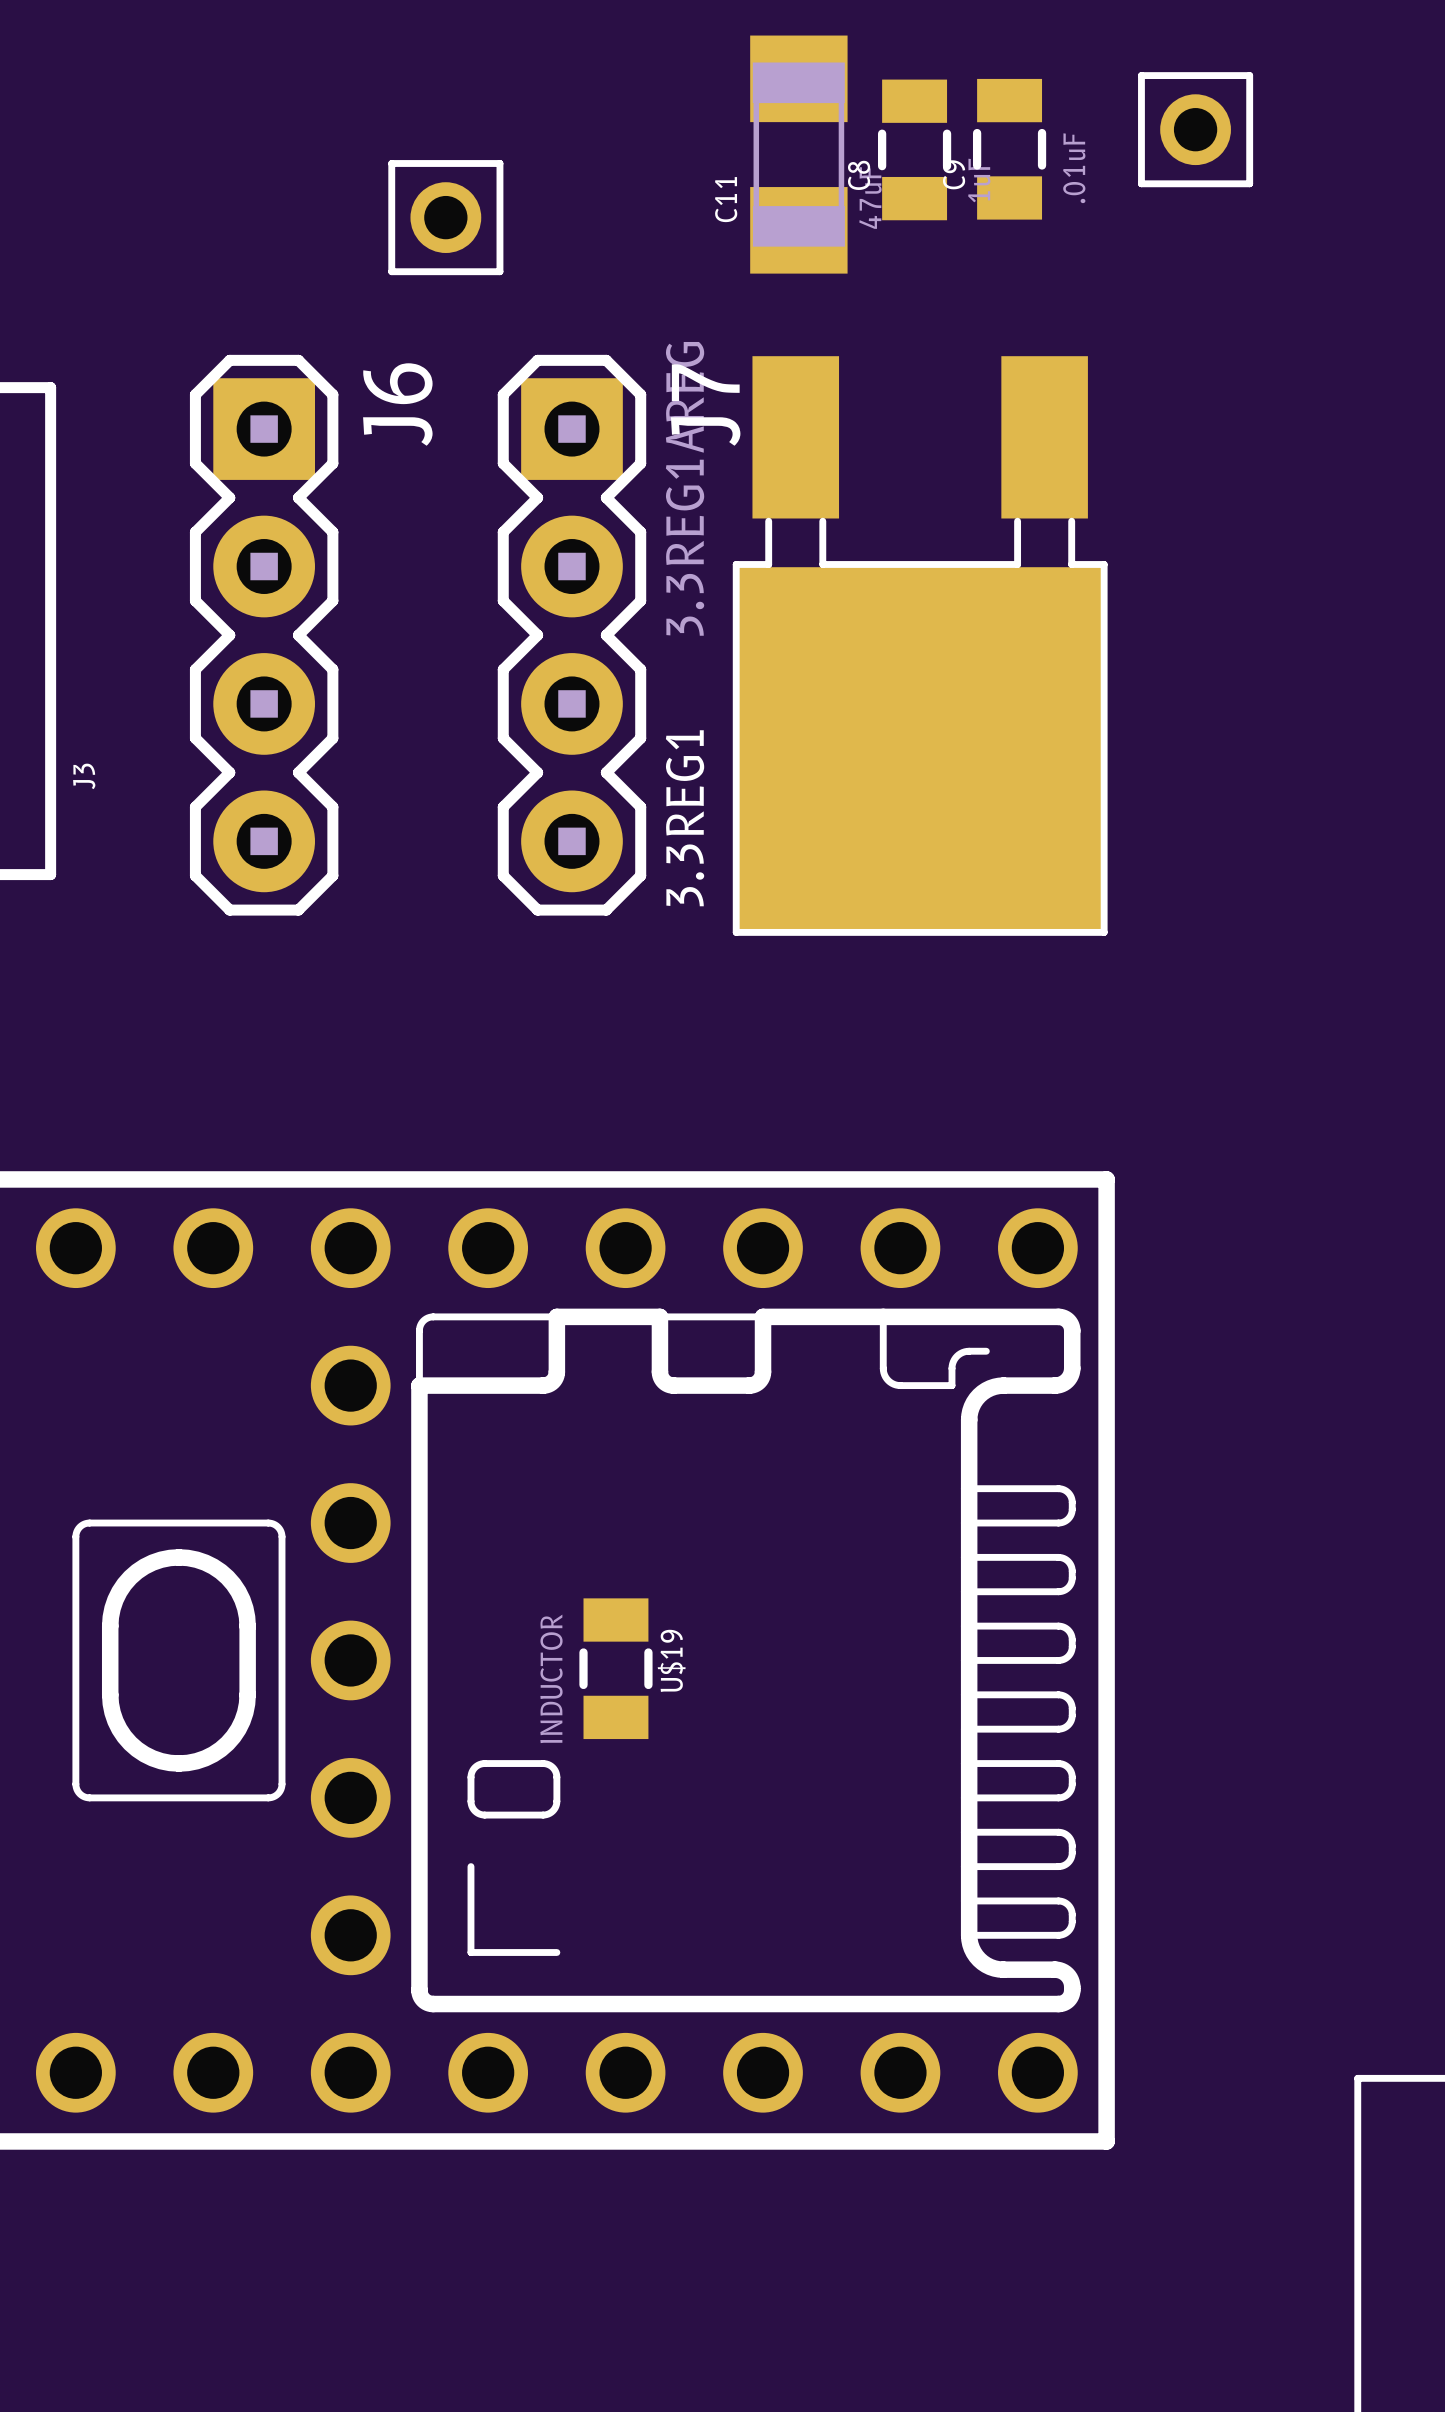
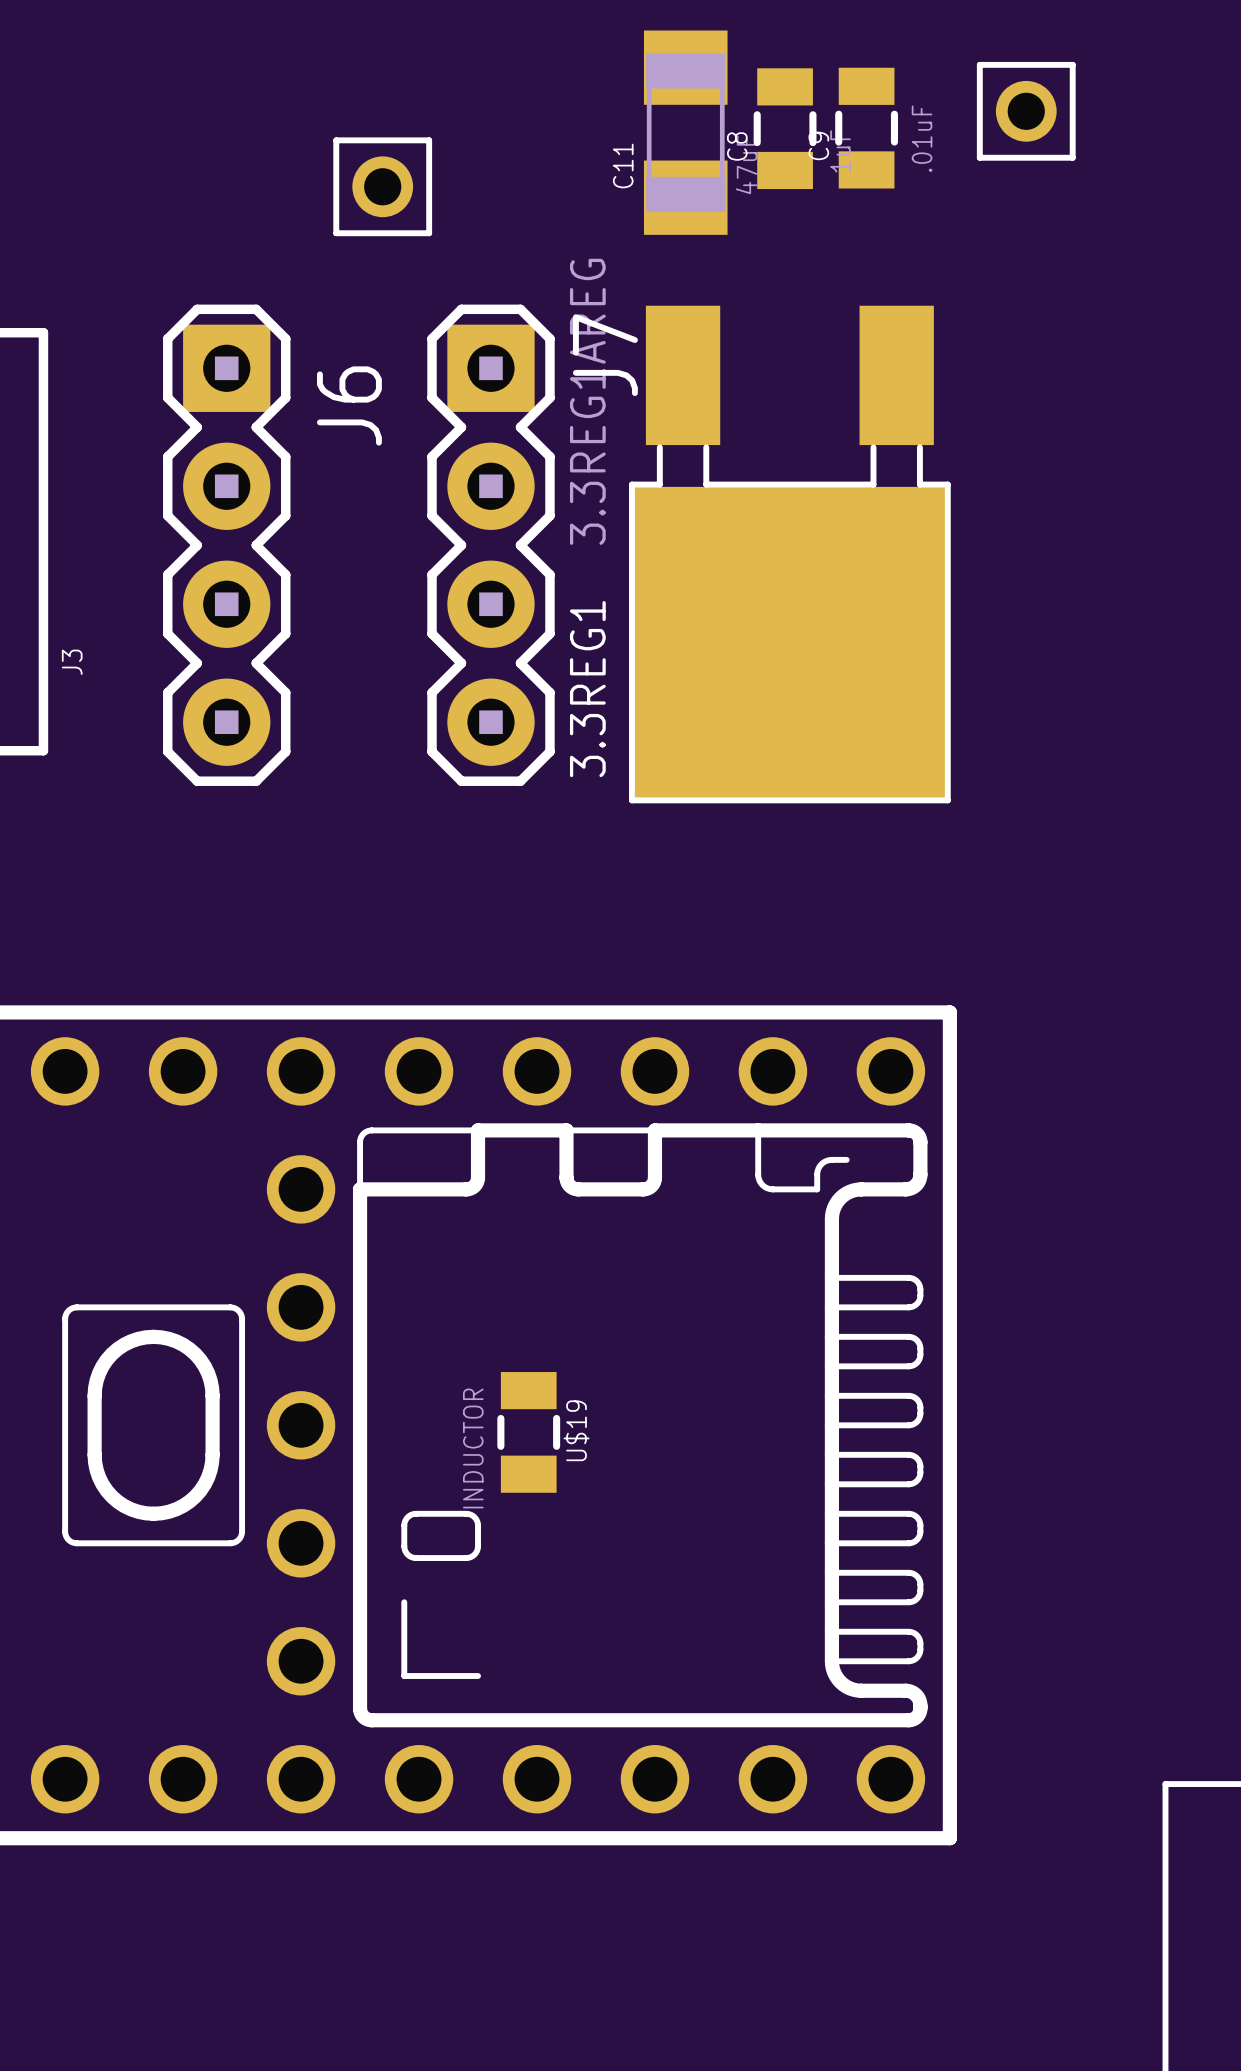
J6 name position: J6 (397, 404) -> J6 (349, 405)

